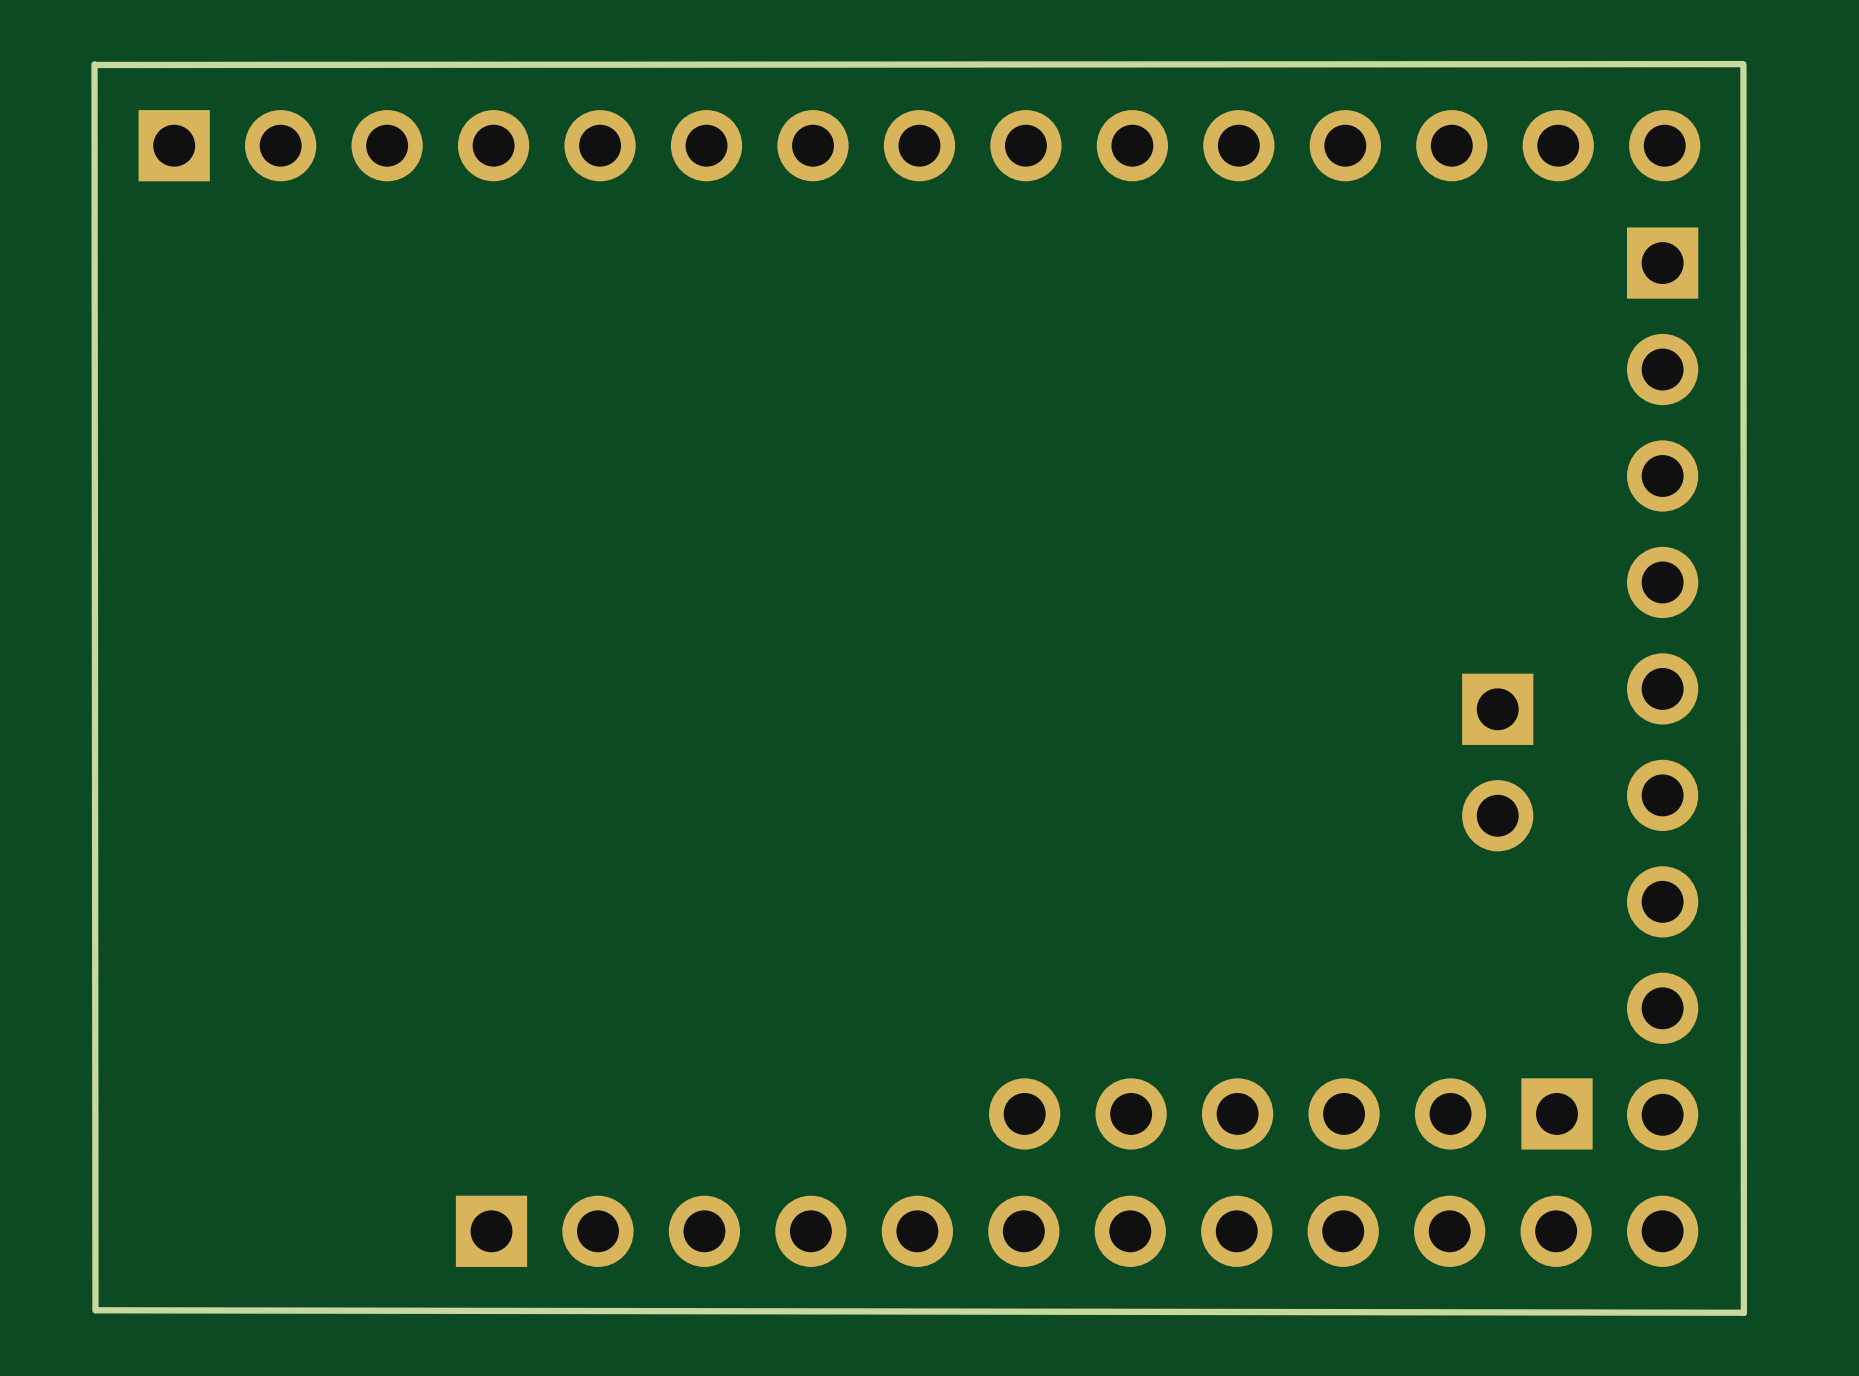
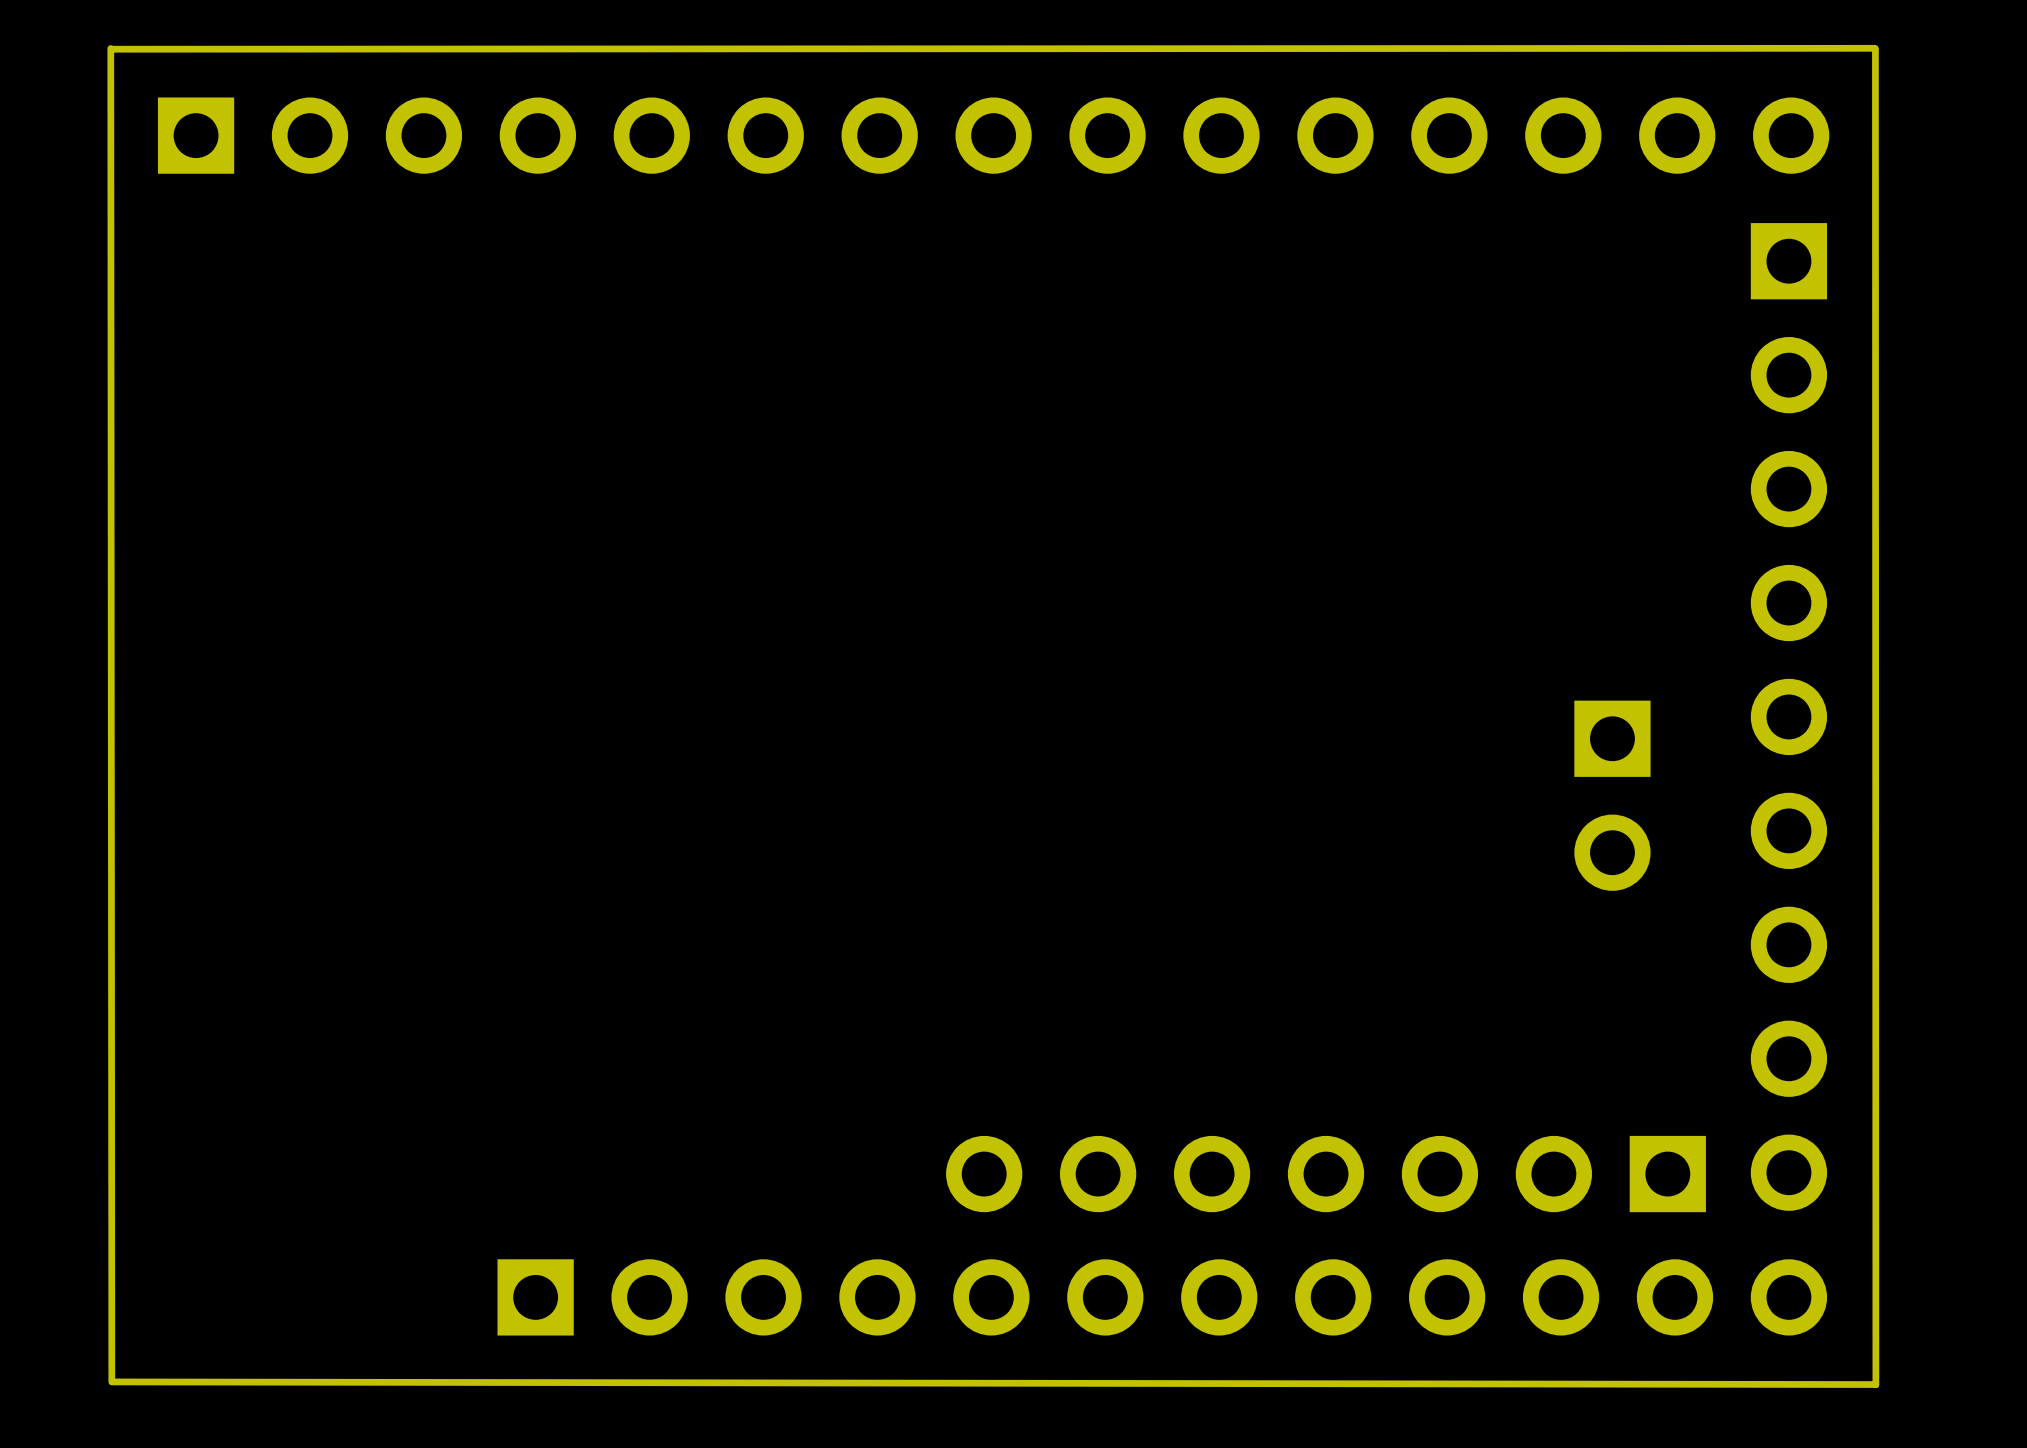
part: (1290, 1113) -> none
part: none -> (1326, 1174)

